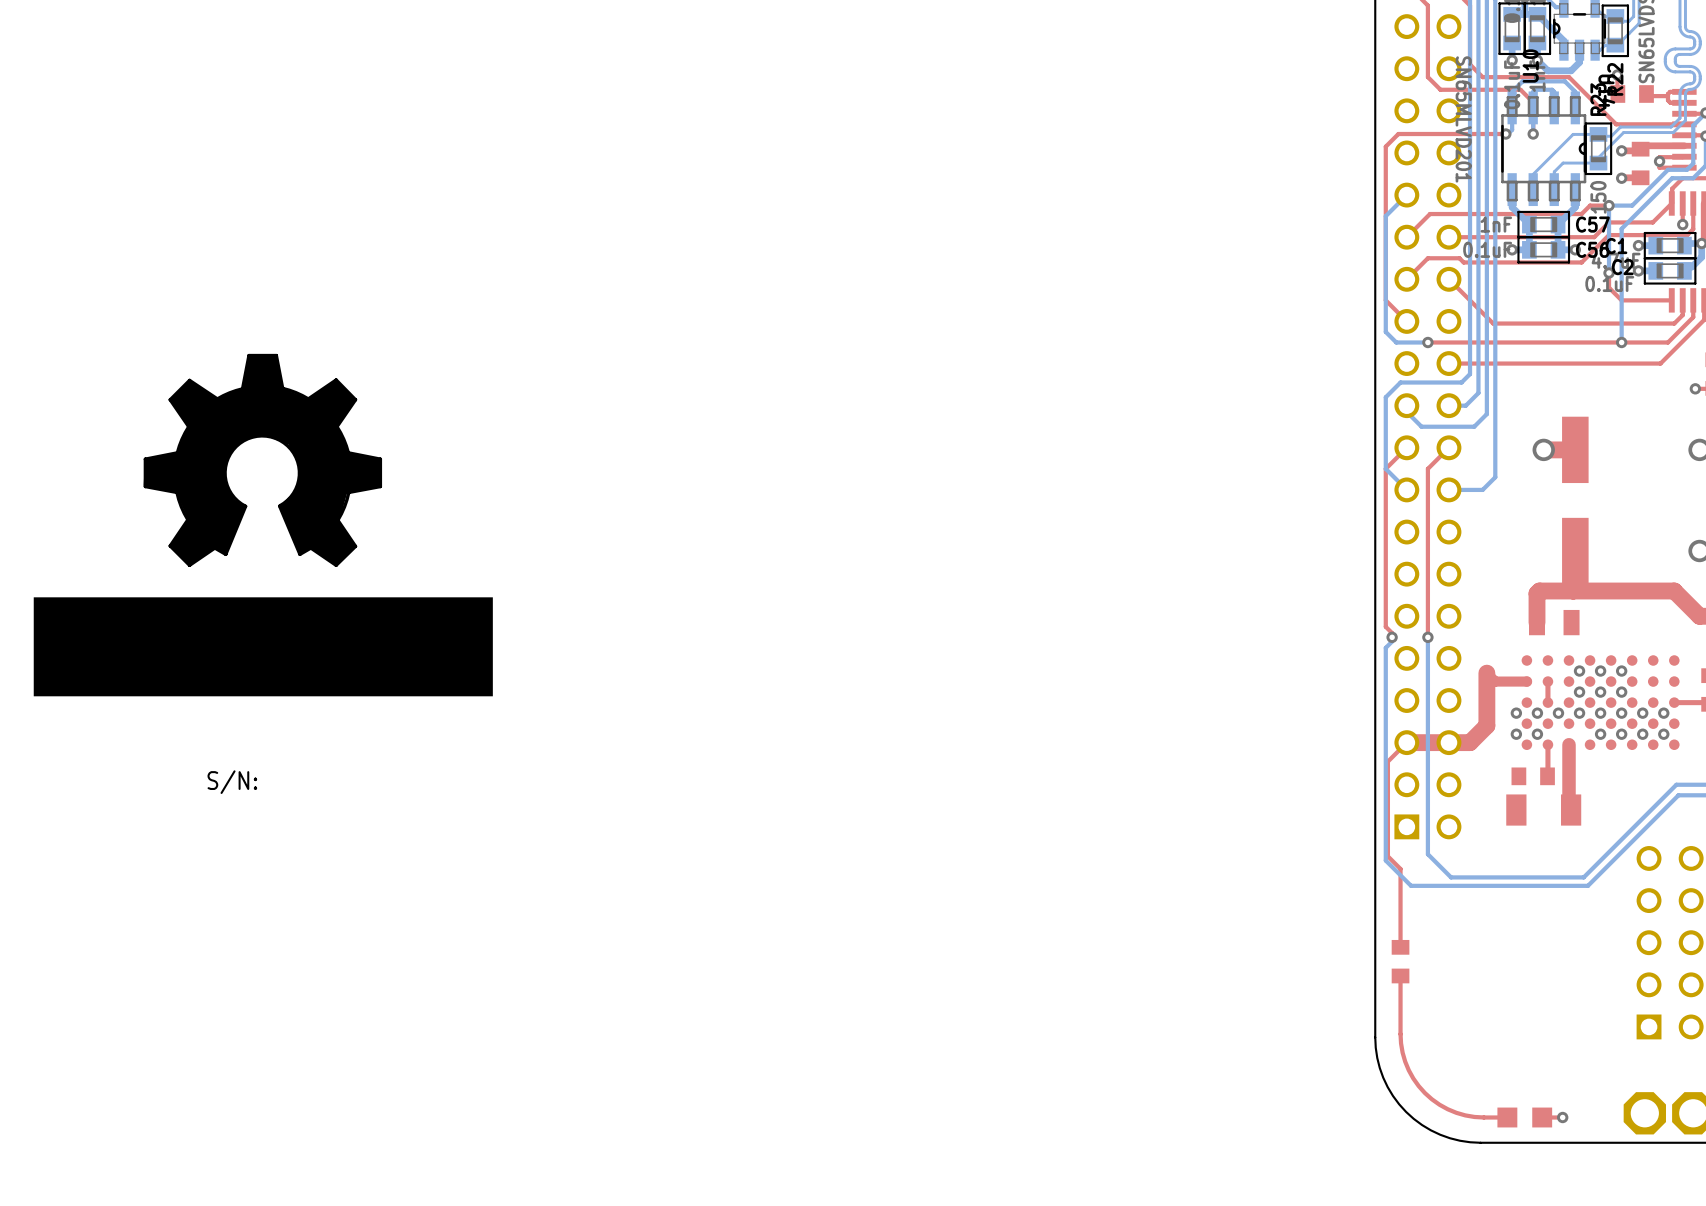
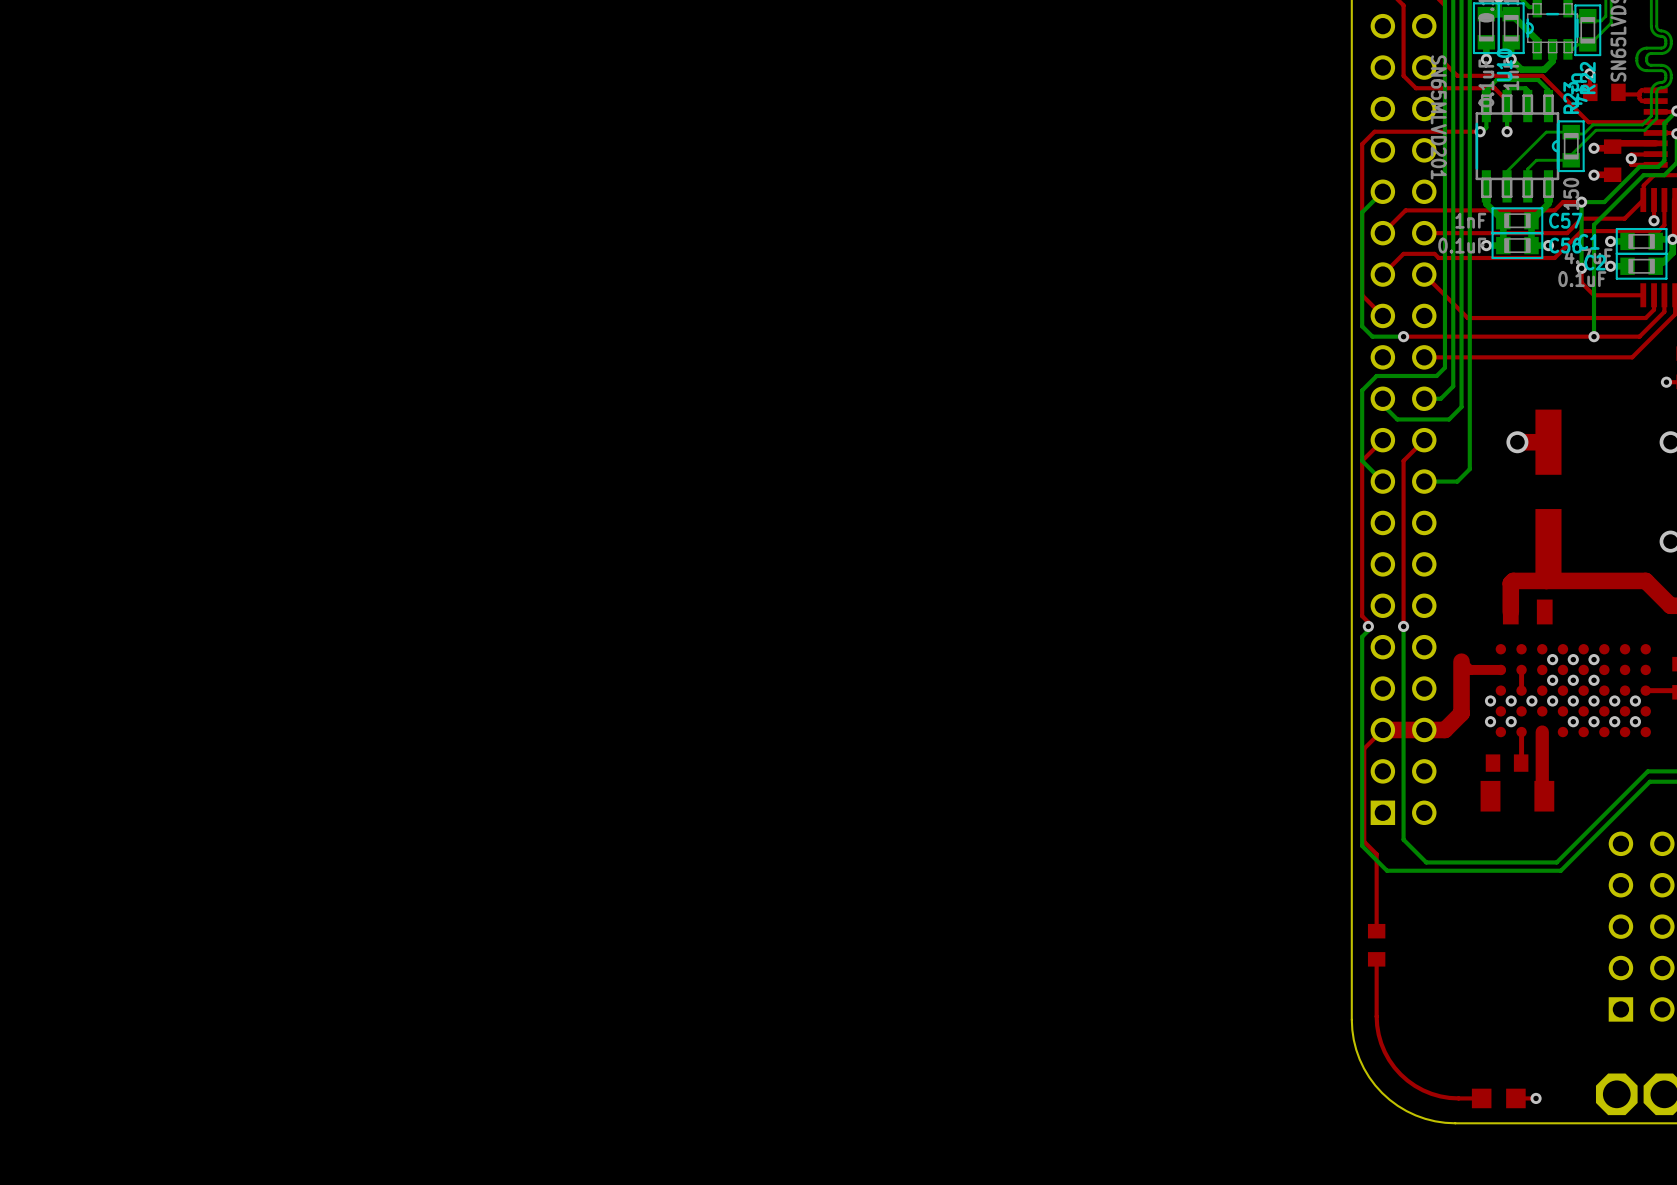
drawing: [143, 353, 383, 567] -> none
drawing: [33, 597, 493, 697] -> none
text: S/N: (232, 782) -> none

